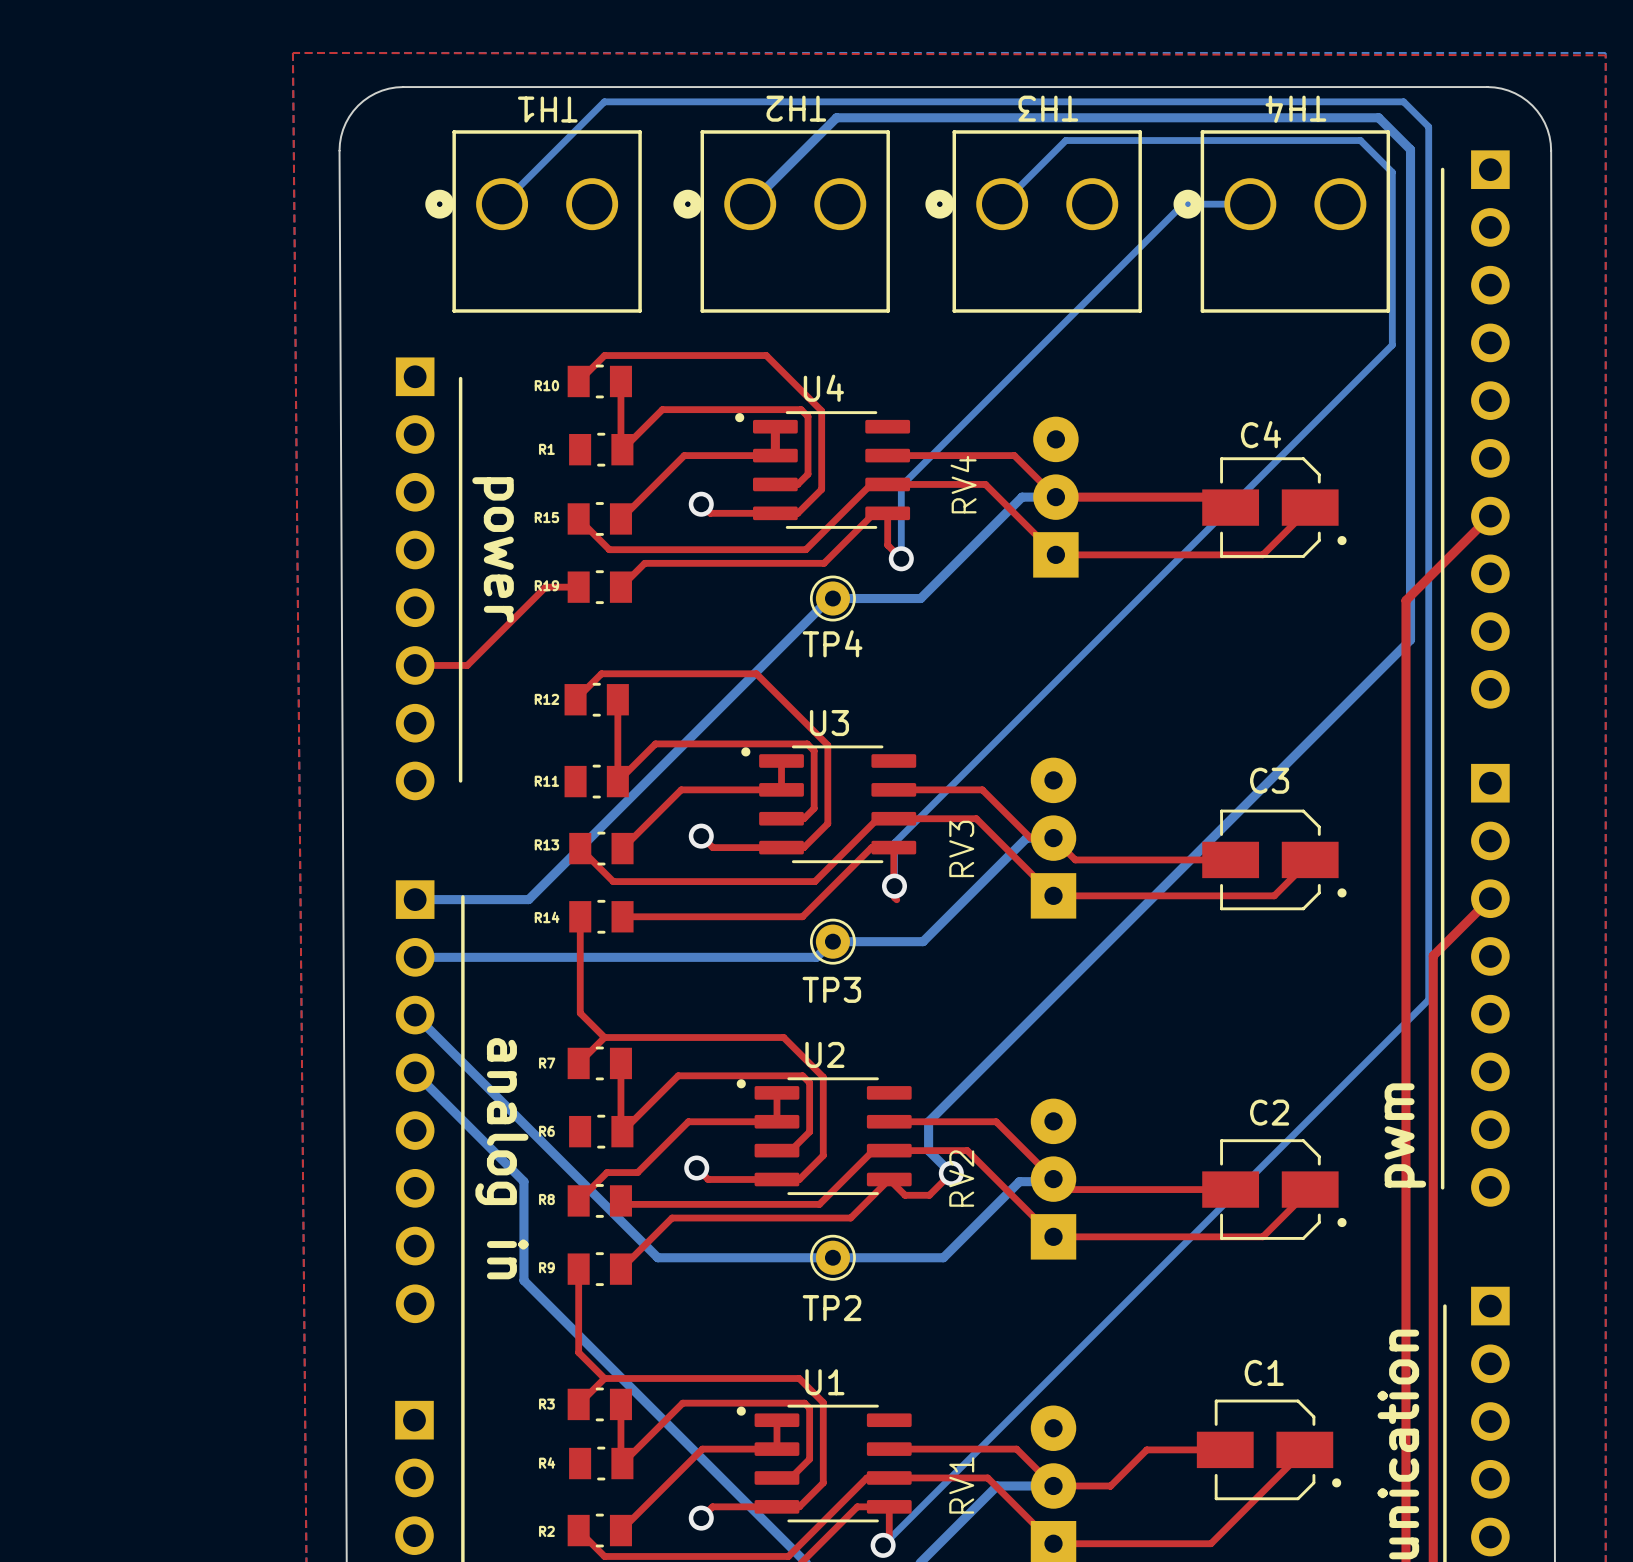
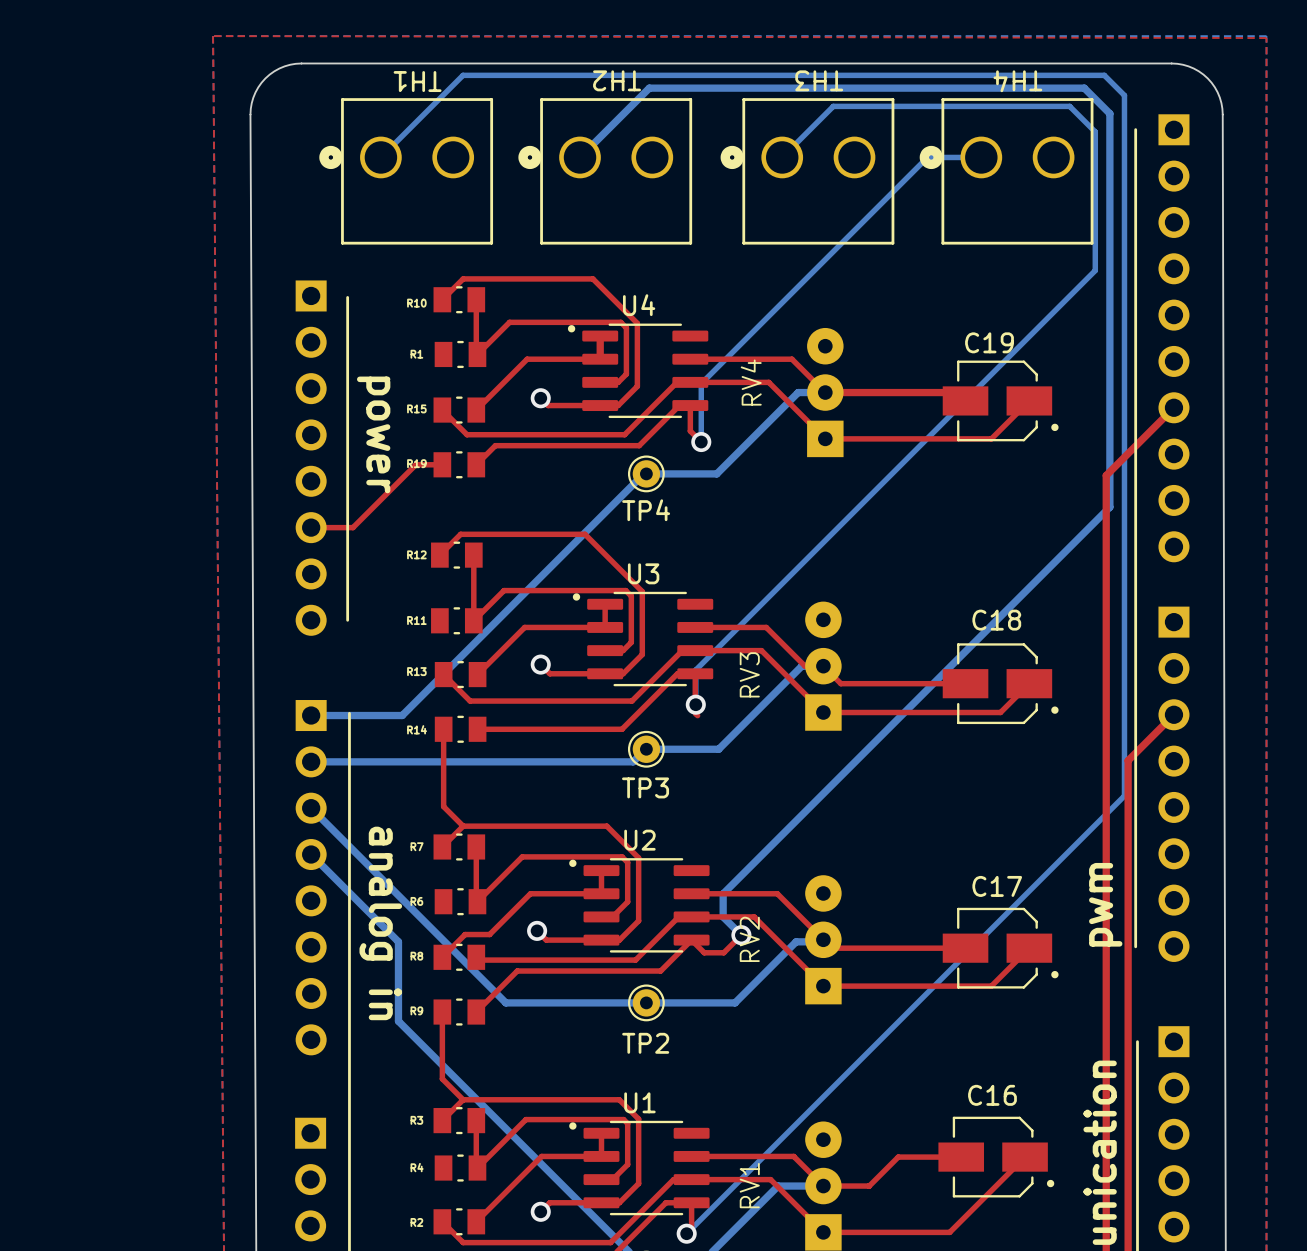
C4 name: C4 (1261, 434) -> C19 (989, 342)
C3 name: C3 (1269, 780) -> C18 (996, 620)
C2 name: C2 (1269, 1112) -> C17 (997, 886)
C1 name: C1 (1264, 1372) -> C16 (992, 1095)

